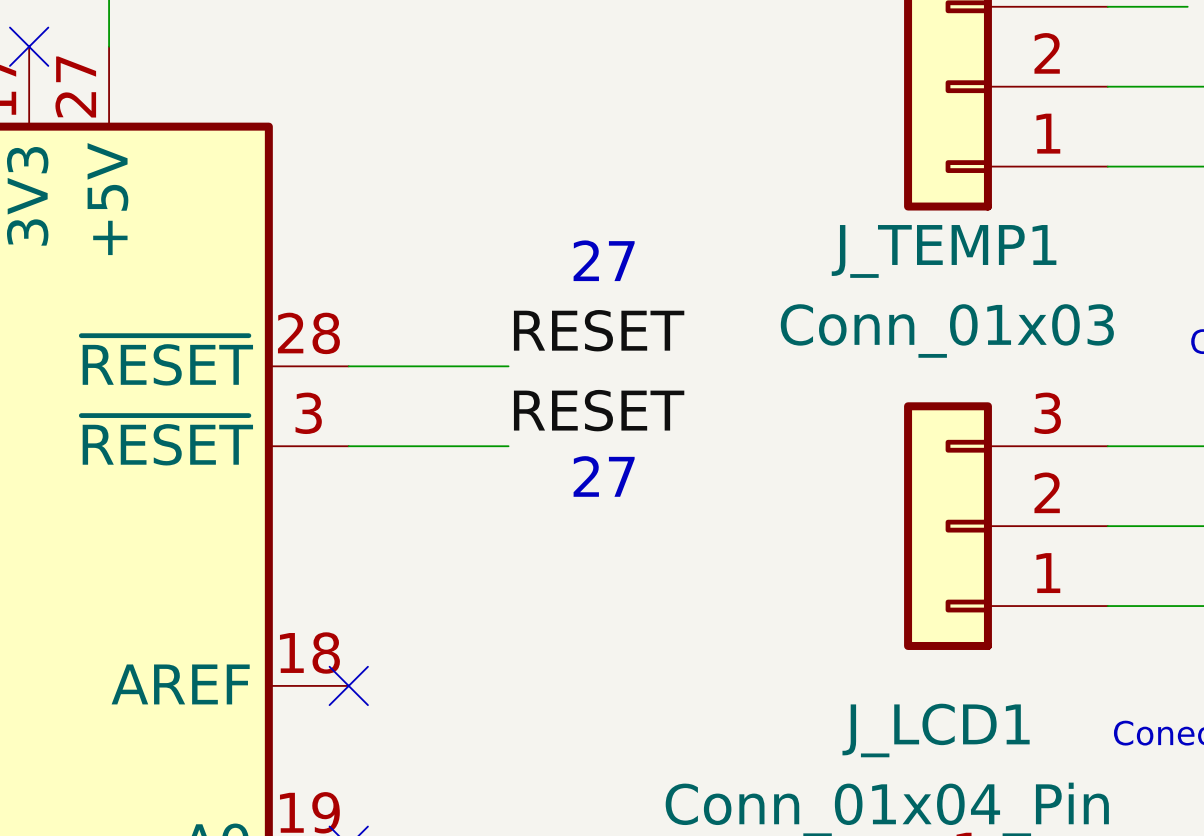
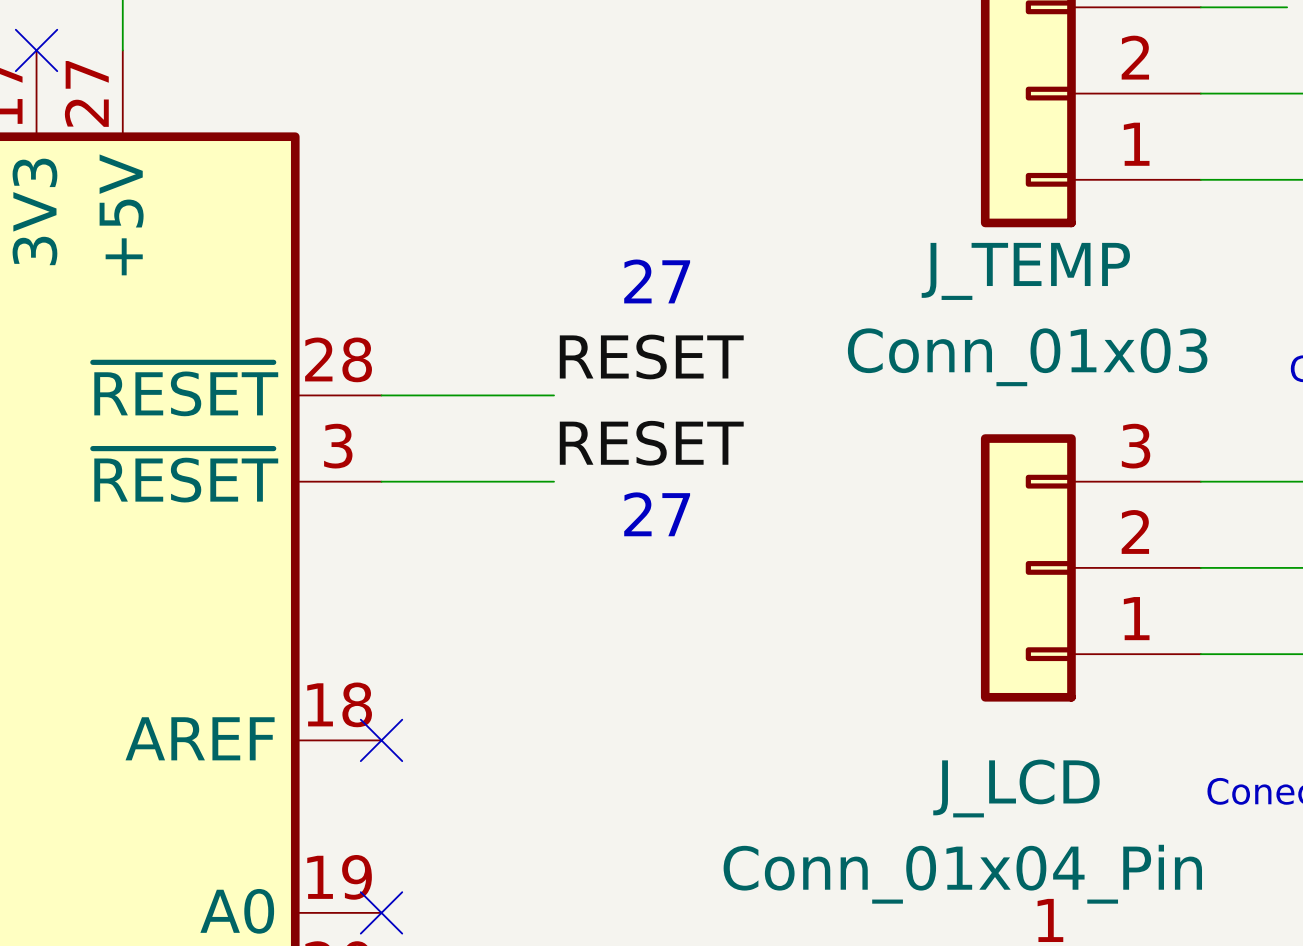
J_TEMP1 name: J_TEMP1 (944, 251) -> J_TEMP (1025, 271)
J_LCD1 name: J_LCD1 (936, 730) -> J_LCD (1016, 788)

